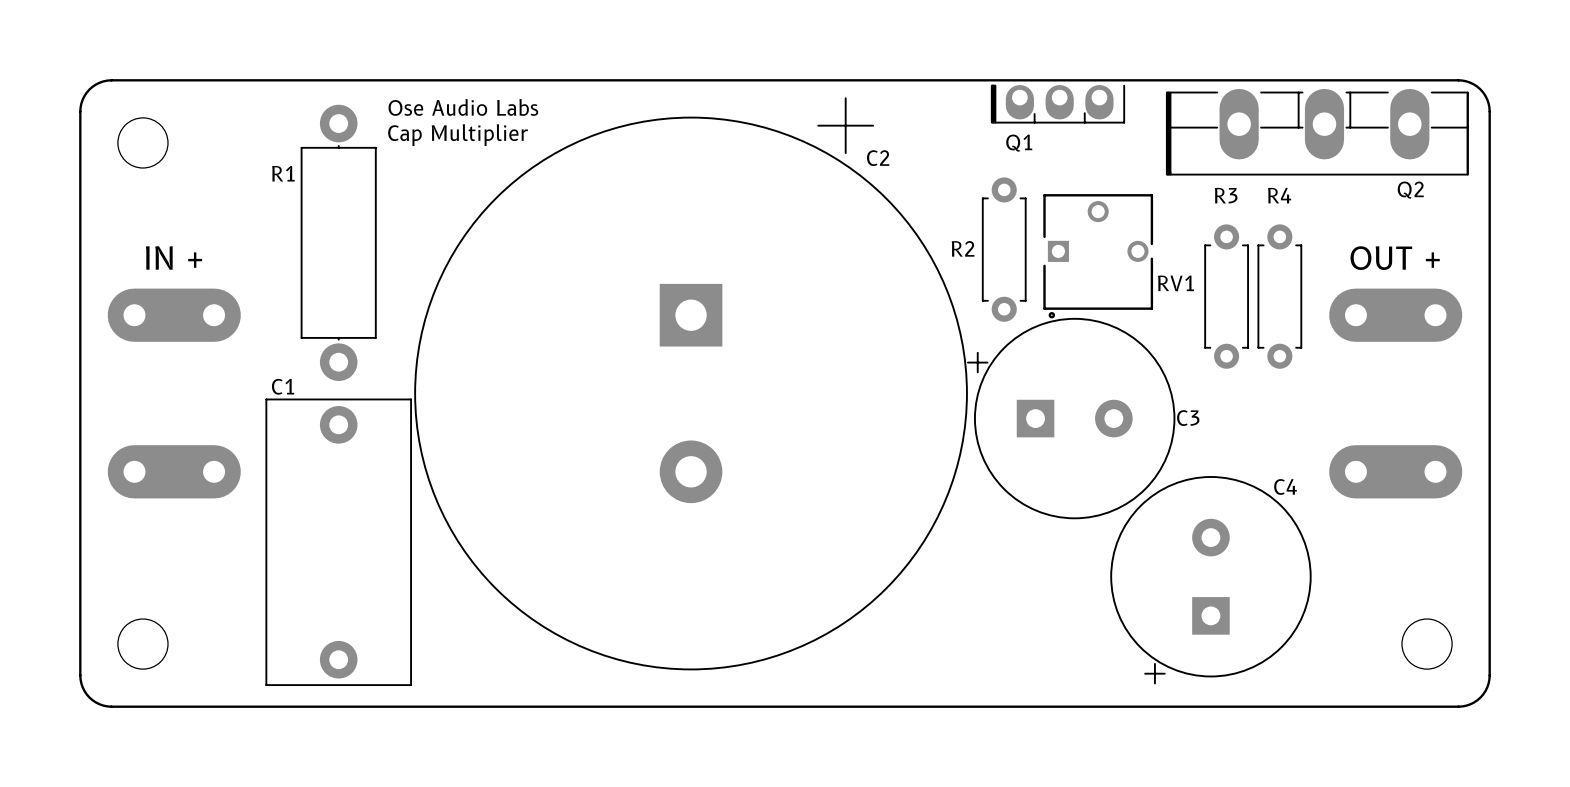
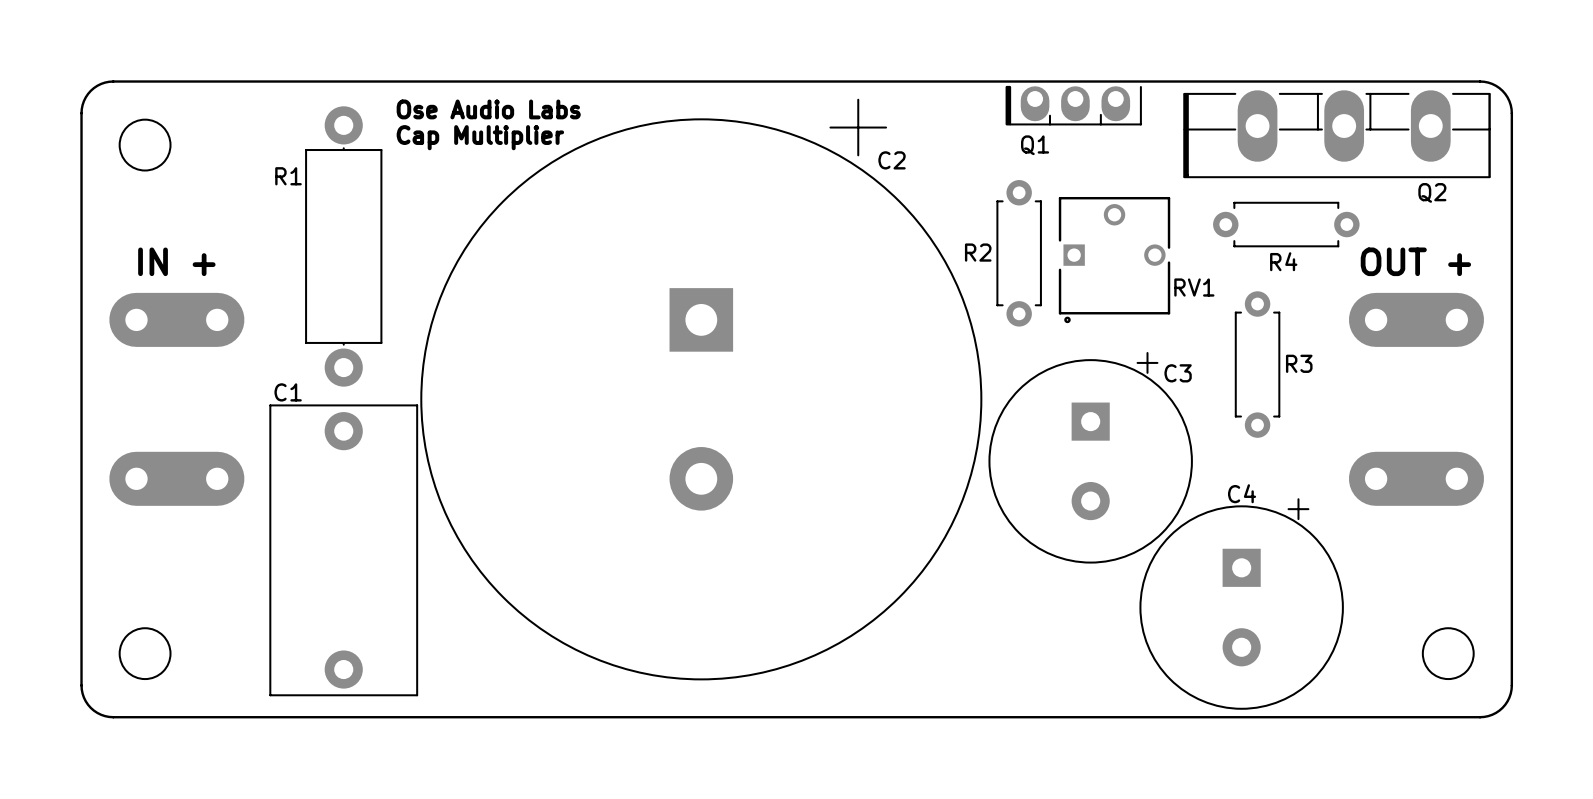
R3 name position: R3 (1226, 195) -> R3 (1299, 363)
R4 name position: R4 (1279, 195) -> R4 (1283, 261)
R3 position: (1226, 296) -> (1257, 364)
R4 rotation: 0° (1279, 296) -> 90° clockwise (1286, 224)
C3 rotation: 0° (1071, 418) -> 90° clockwise (1090, 457)
C3 name position: C3 (1188, 418) -> C3 (1178, 373)
C4 name position: C4 (1285, 486) -> C4 (1242, 493)
C4 rotation: 0° (1210, 580) -> 180° (1241, 604)

